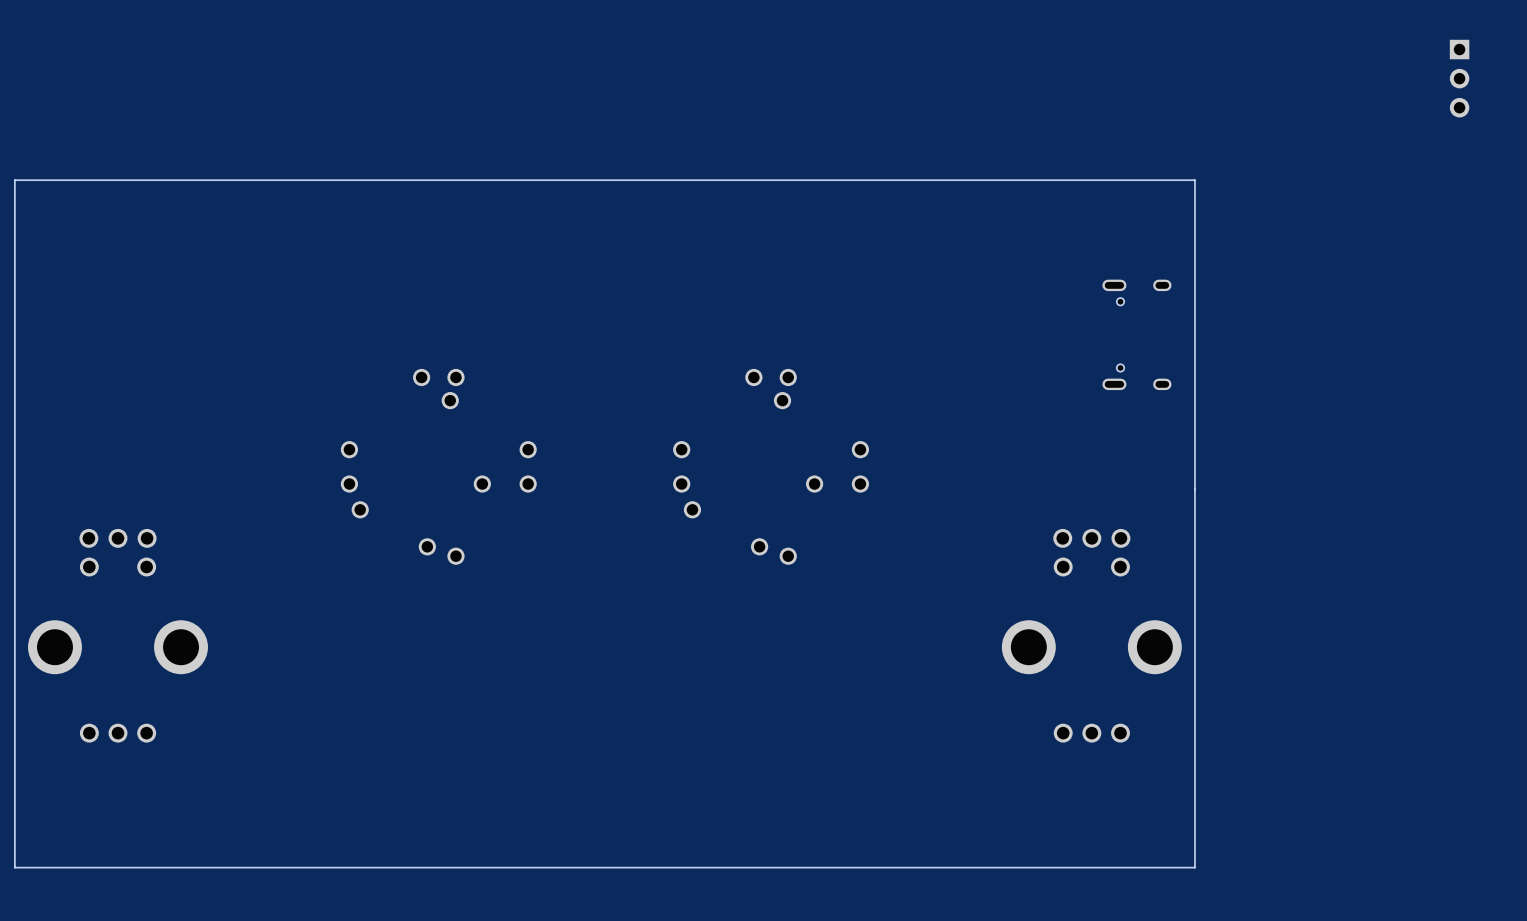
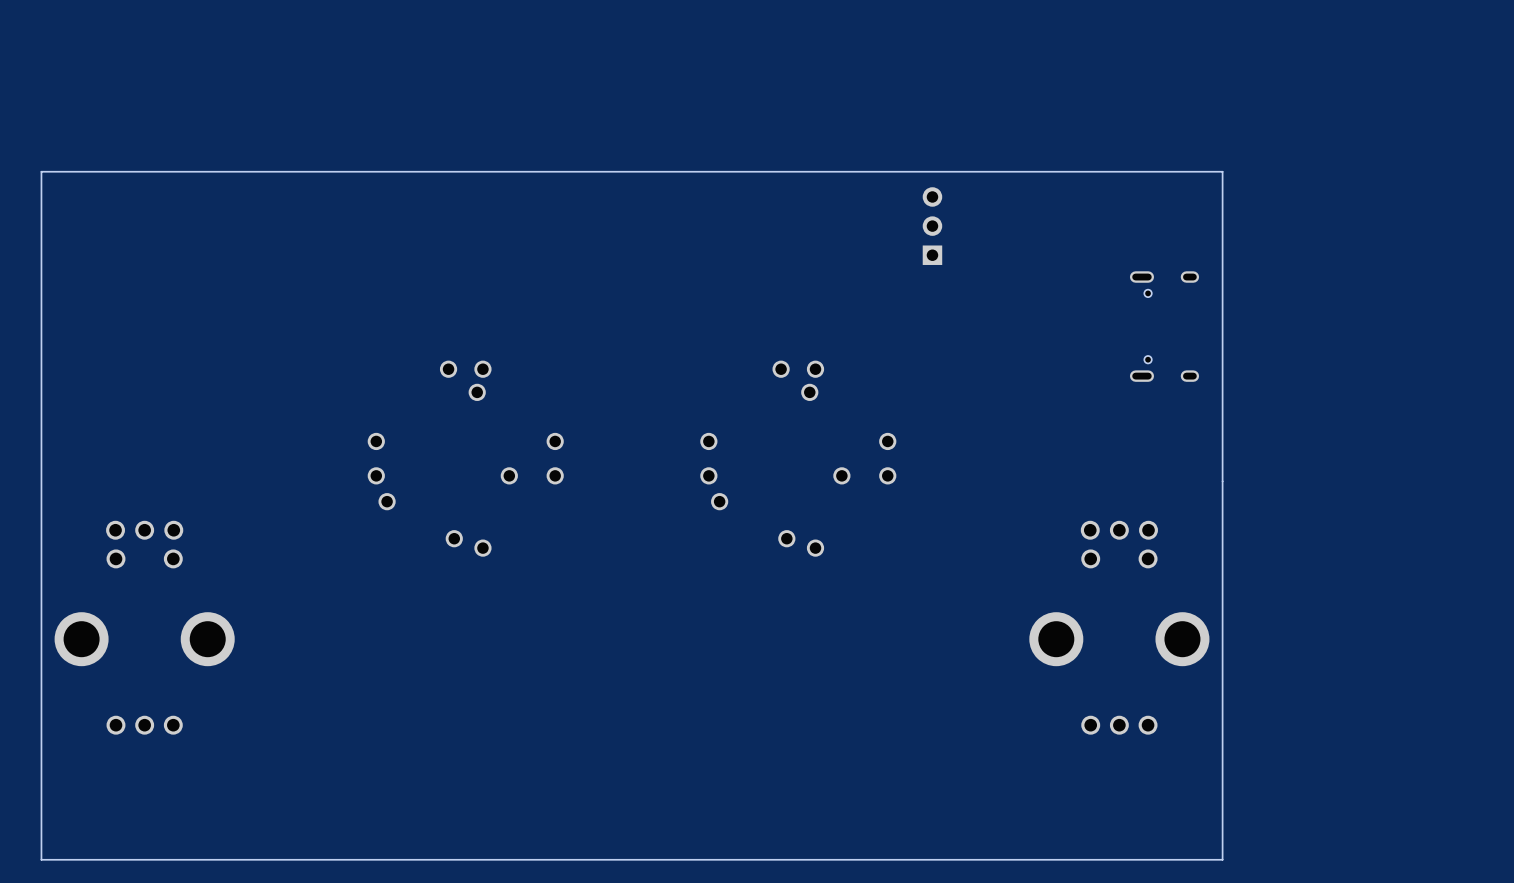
part: (1459, 78) -> none
part: none -> (932, 226)

